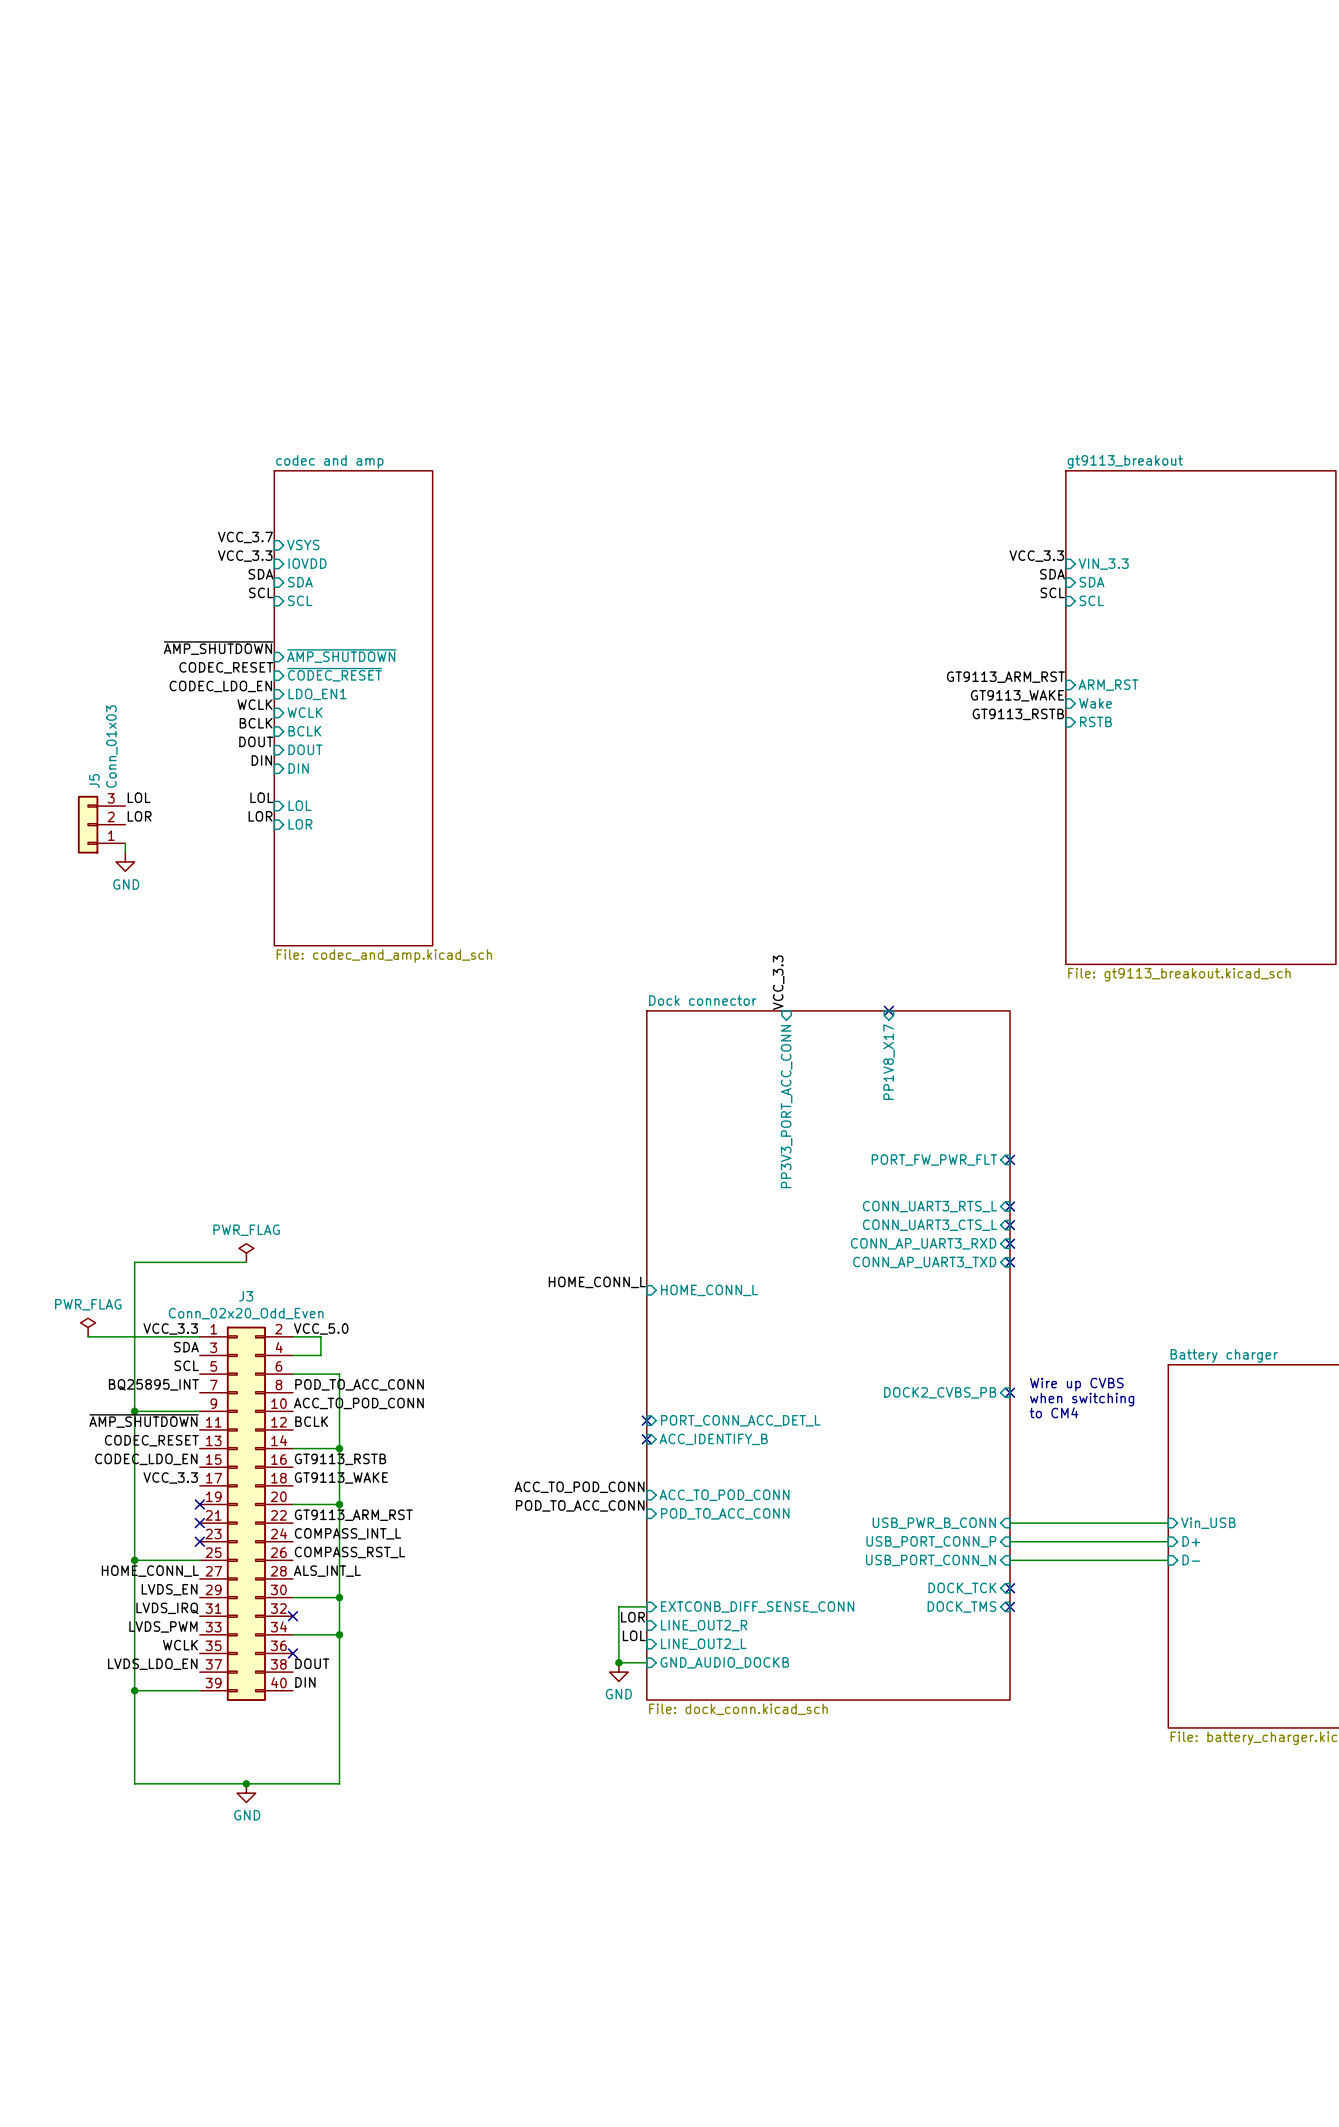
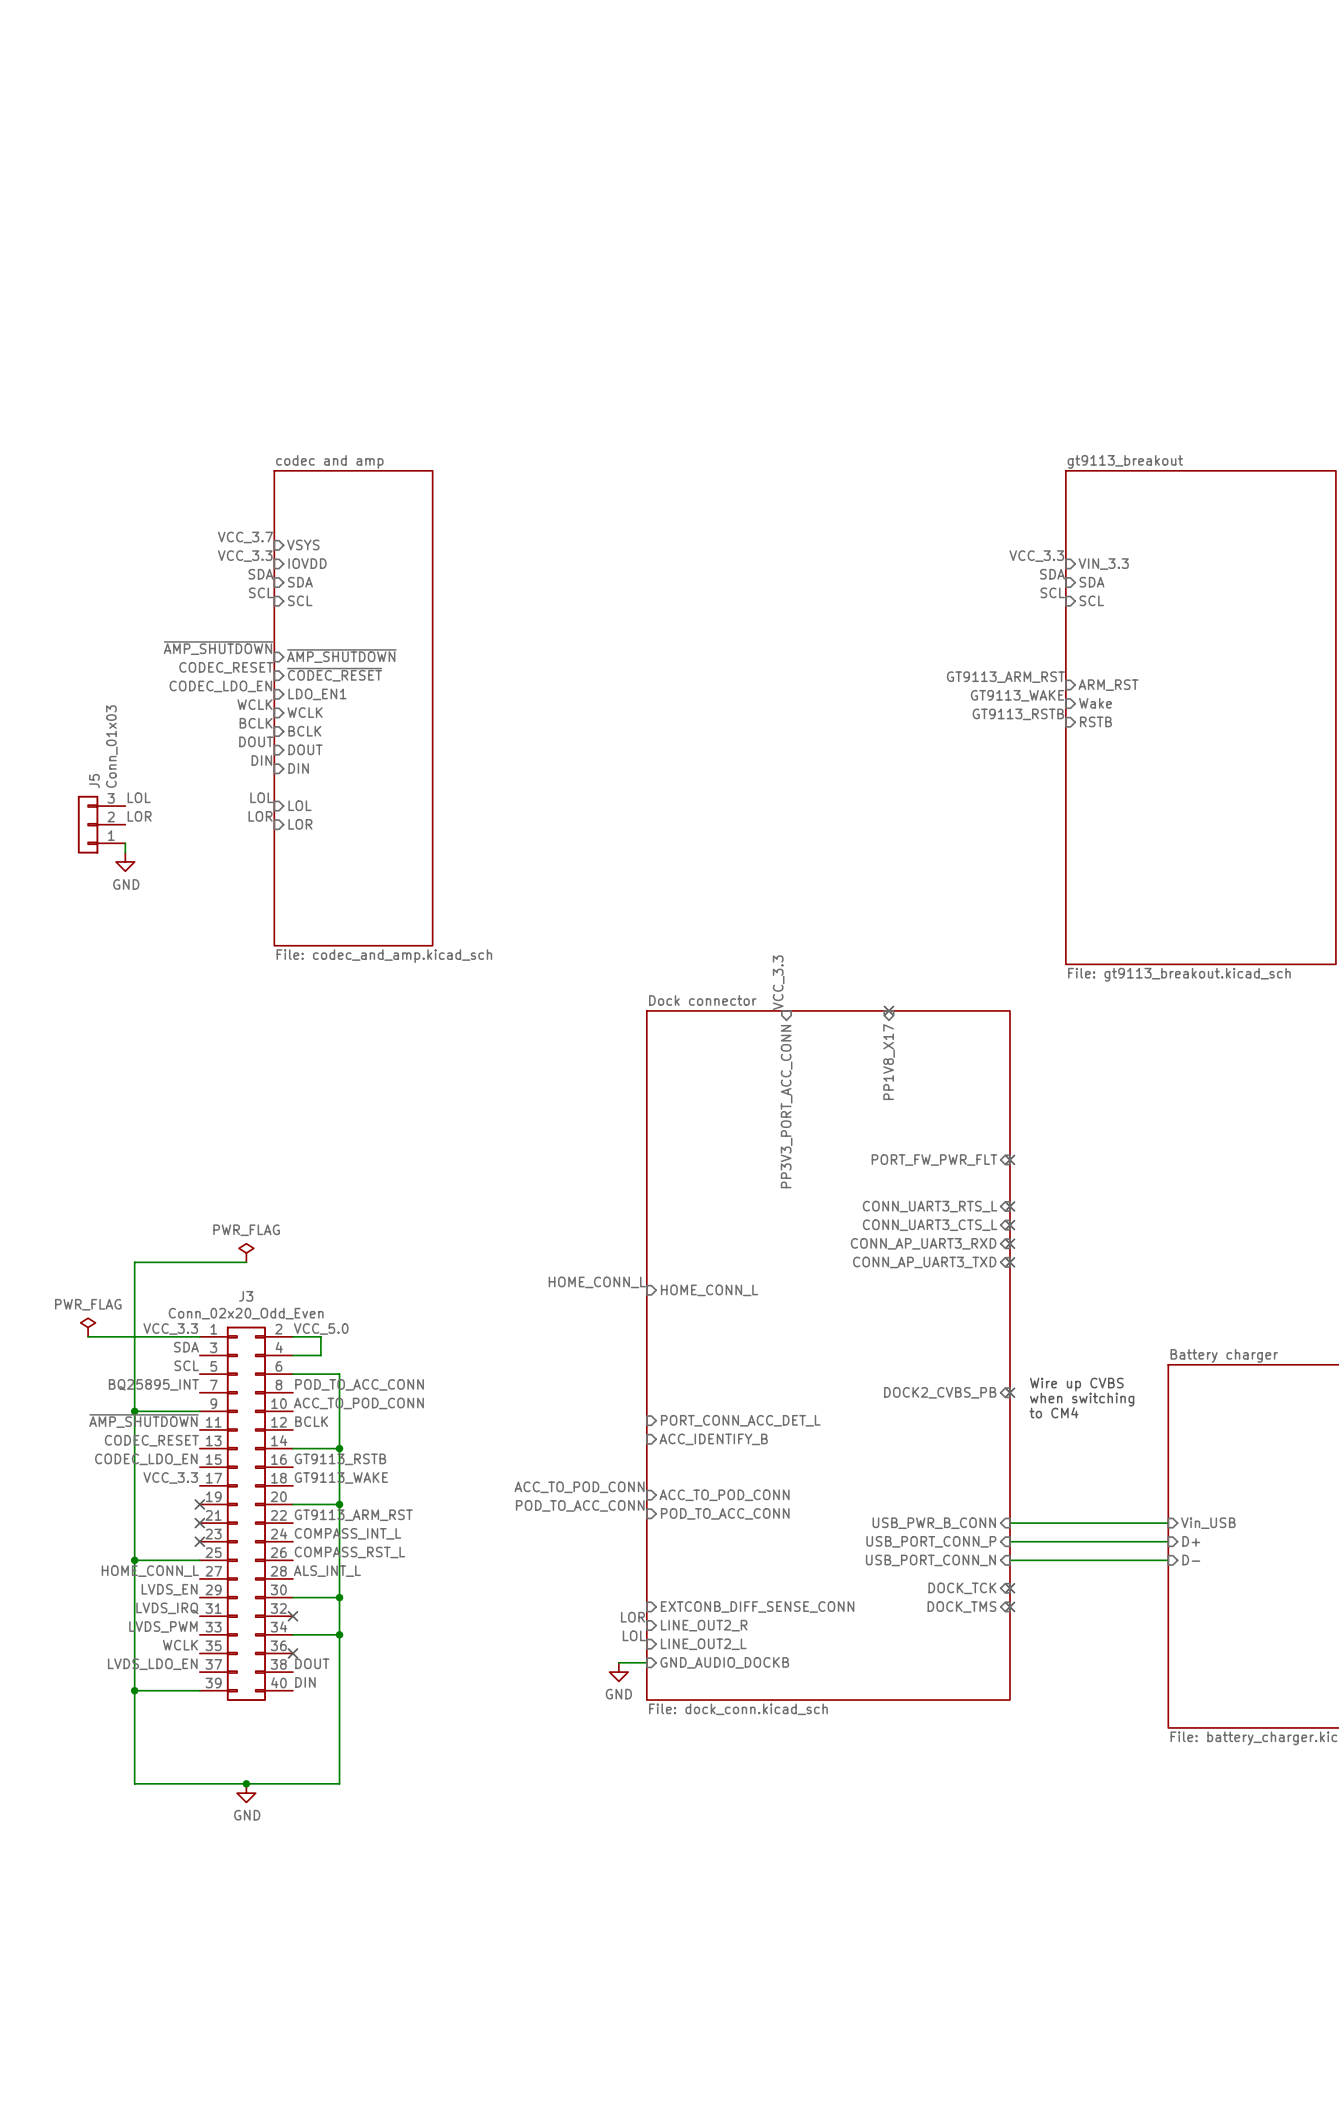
no-connect mark: (646, 1420) -> none
no-connect mark: (646, 1439) -> none
wire: (646, 1606) (618, 1606) (618, 1662) -> none
junction: (618, 1662) -> none

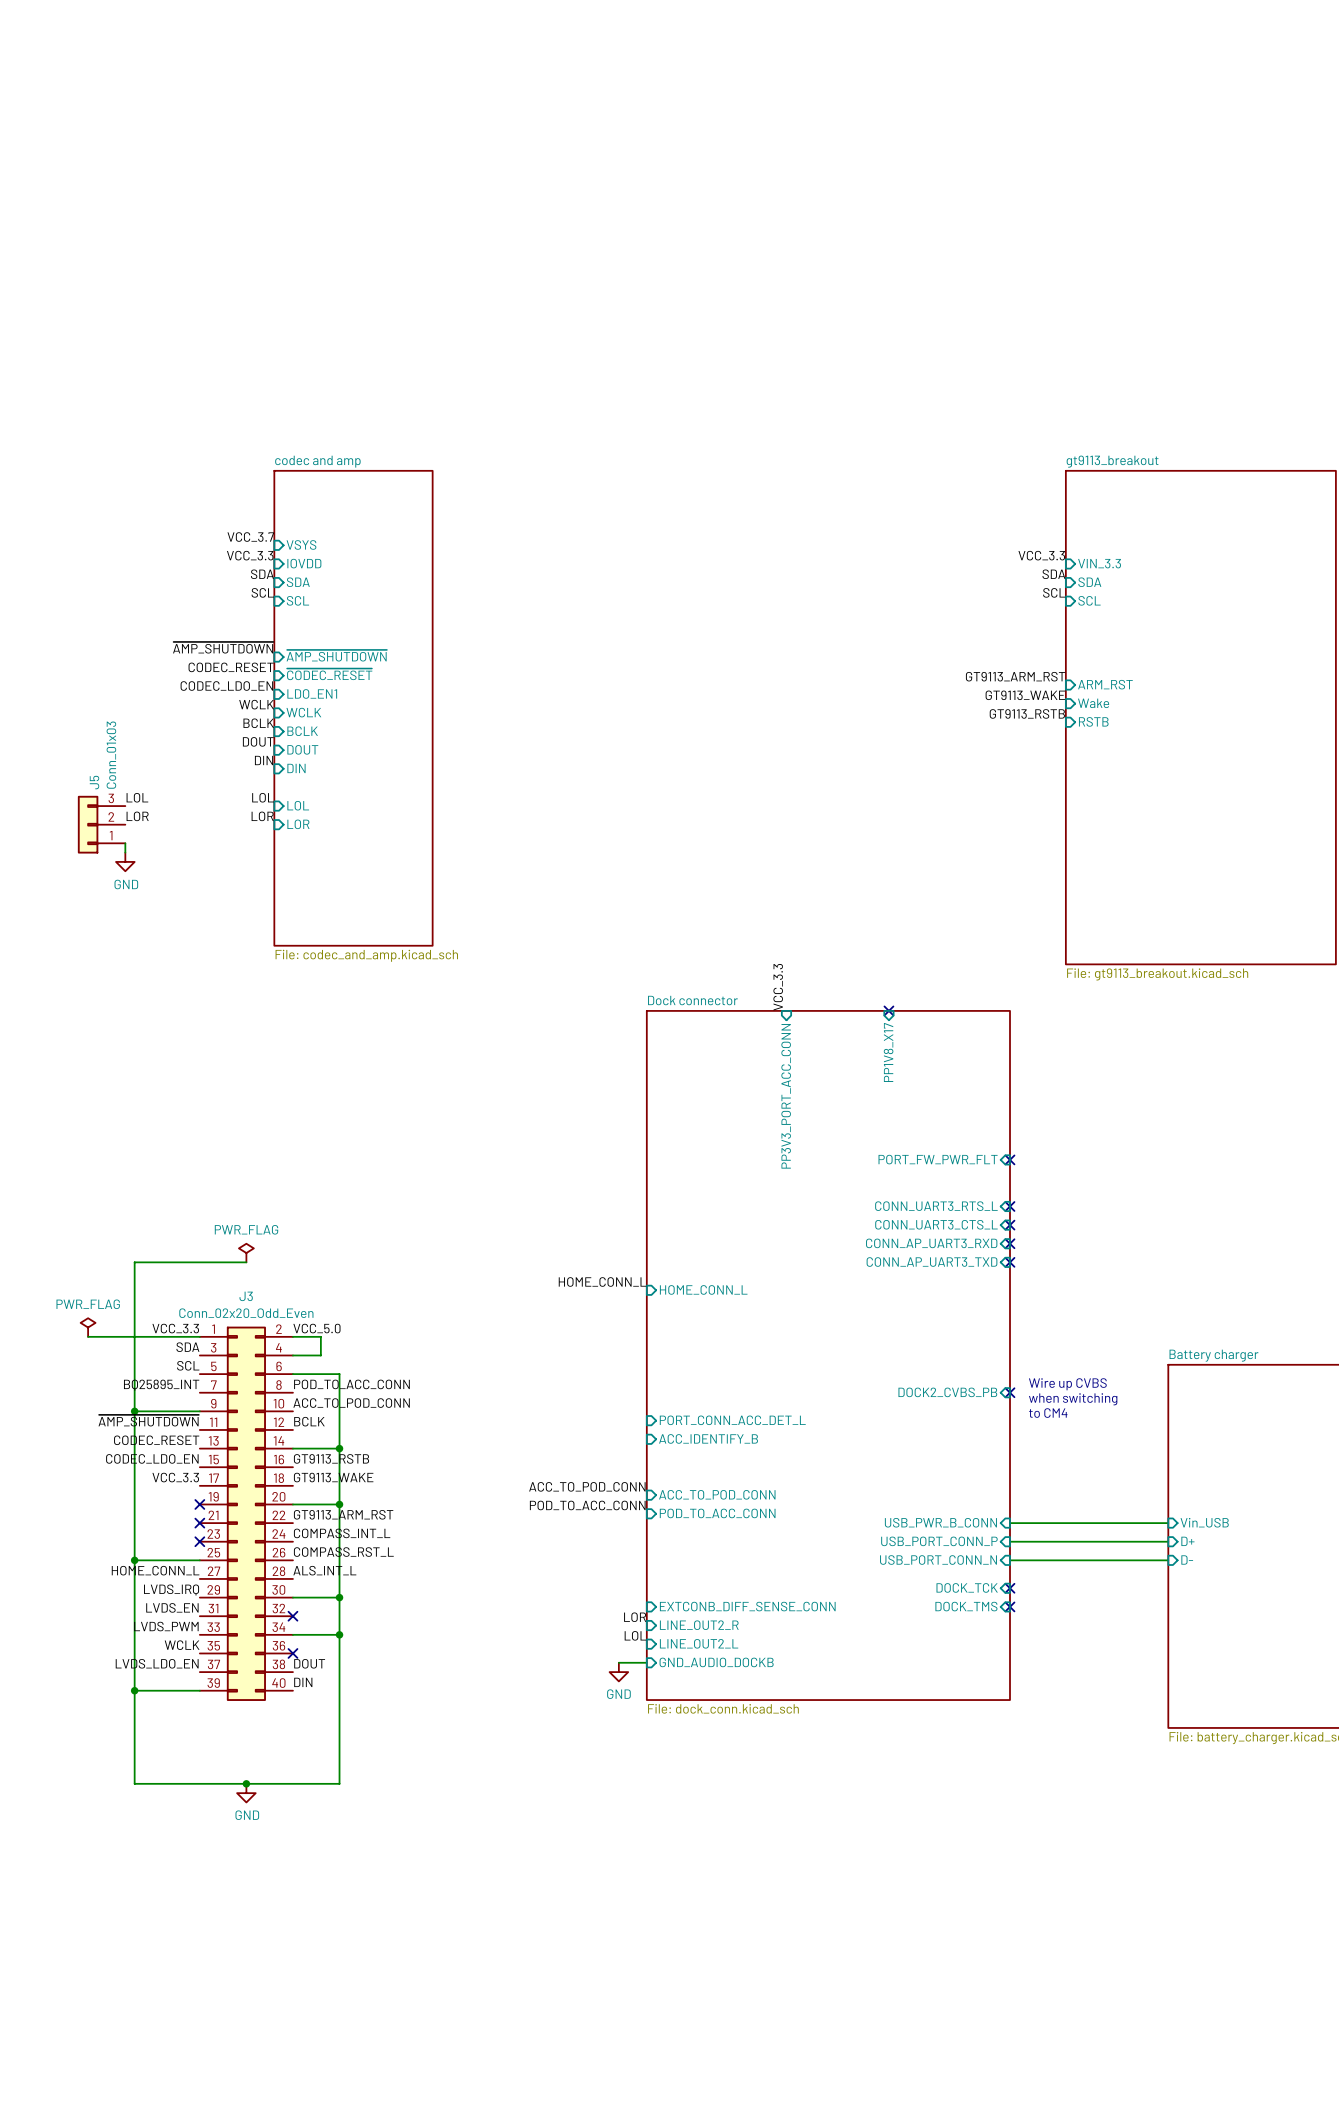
label: LVDS_EN (169, 1589) -> LVDS_IRQ (171, 1590)
label: LVDS_IRQ (167, 1608) -> LVDS_EN (172, 1607)

